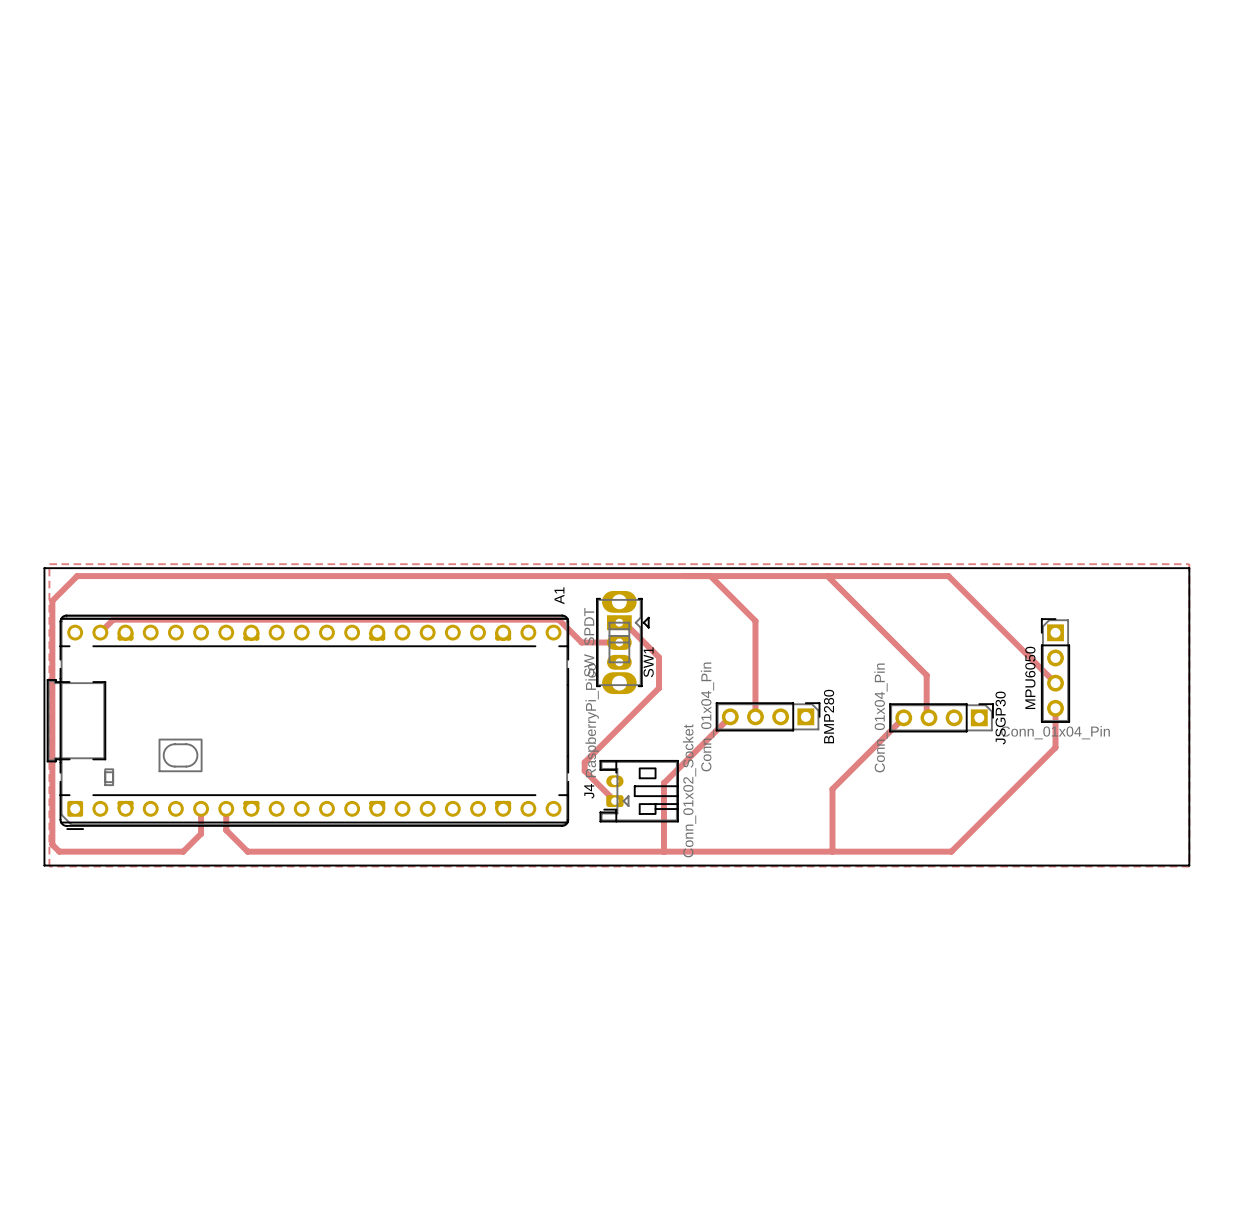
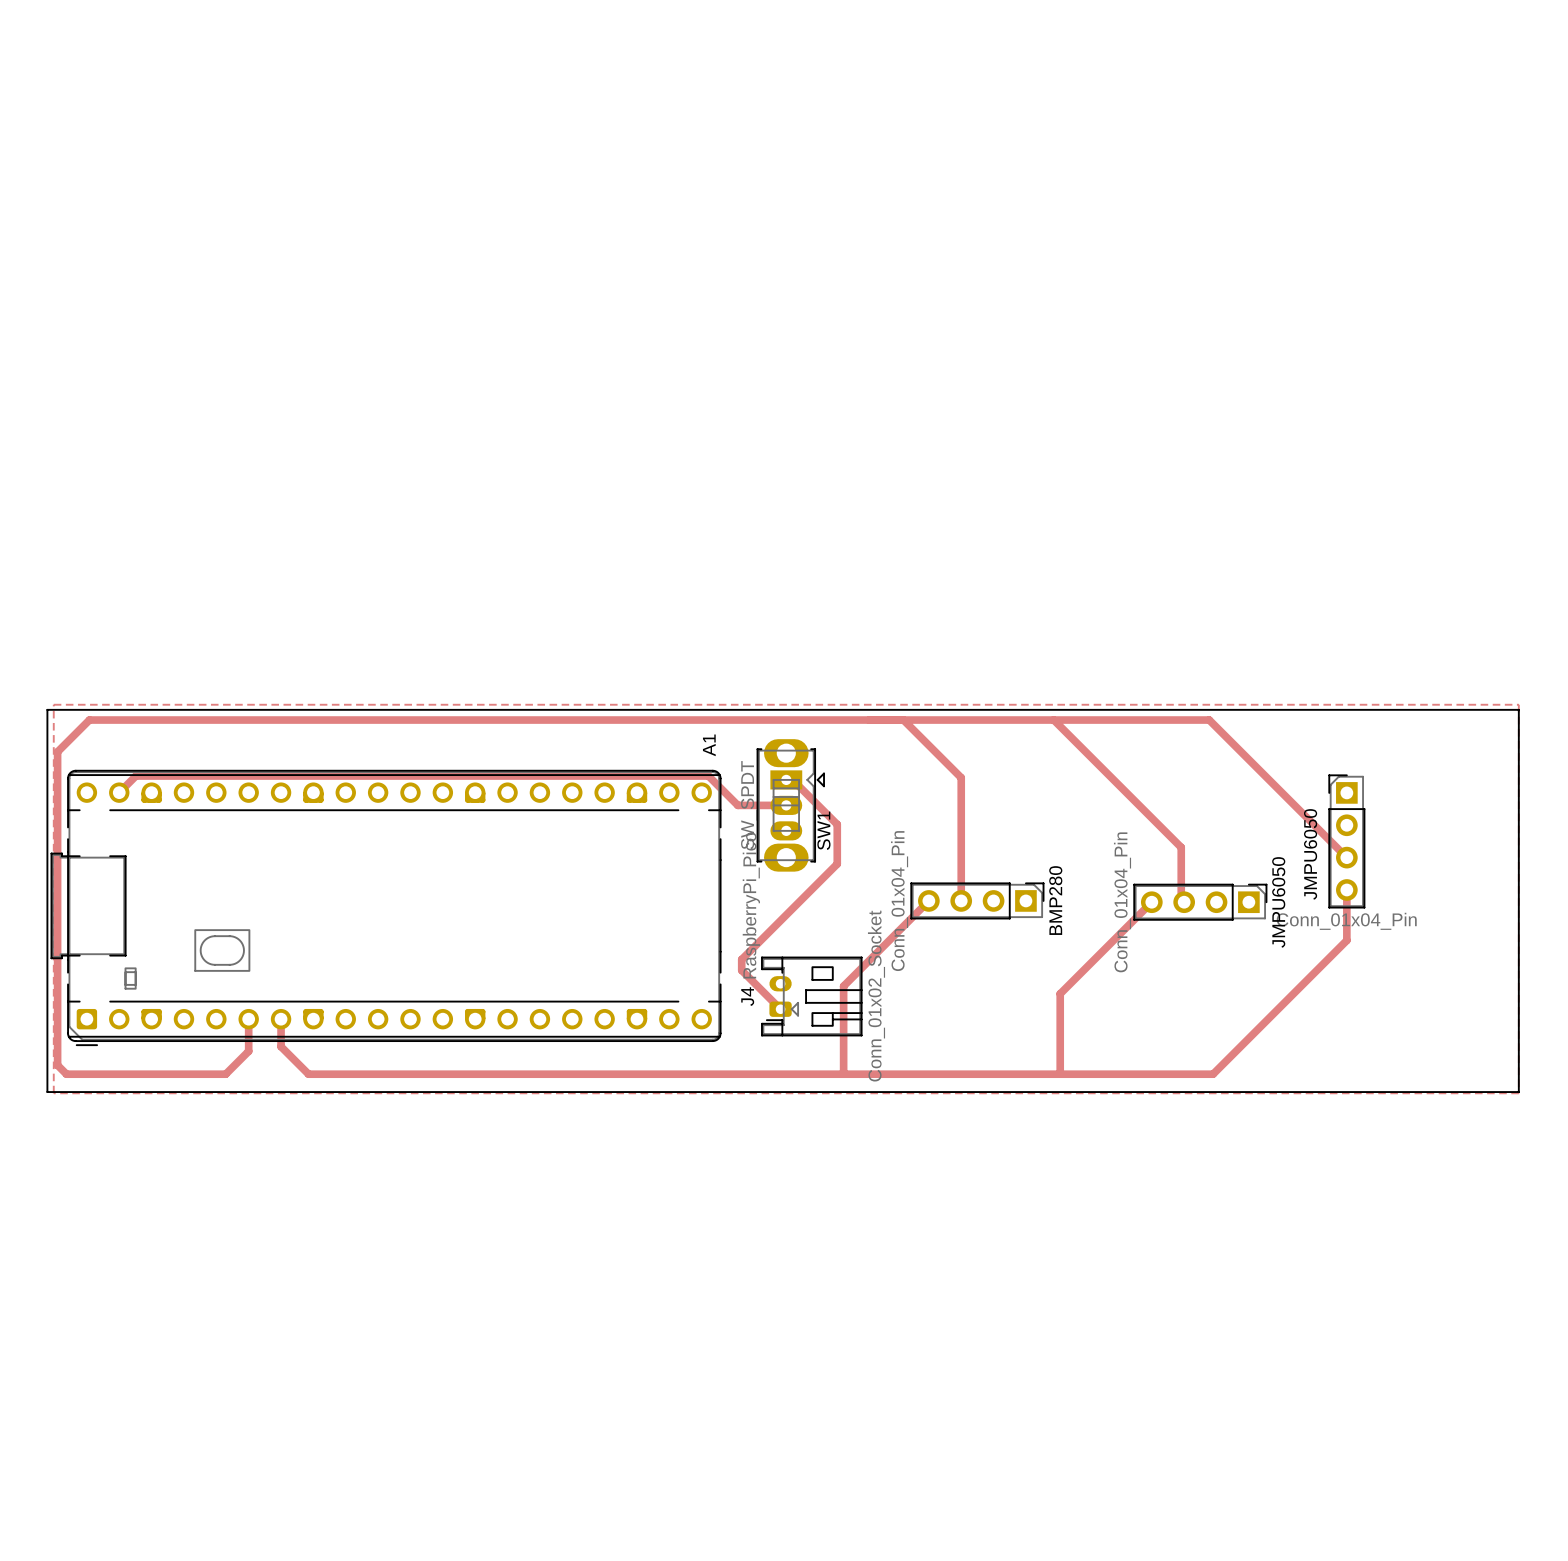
MPU6050 name: MPU6050 (1030, 677) -> JMPU6050 (1278, 902)
JSGP30 name: JSGP30 (1000, 718) -> JMPU6050 (1310, 854)

